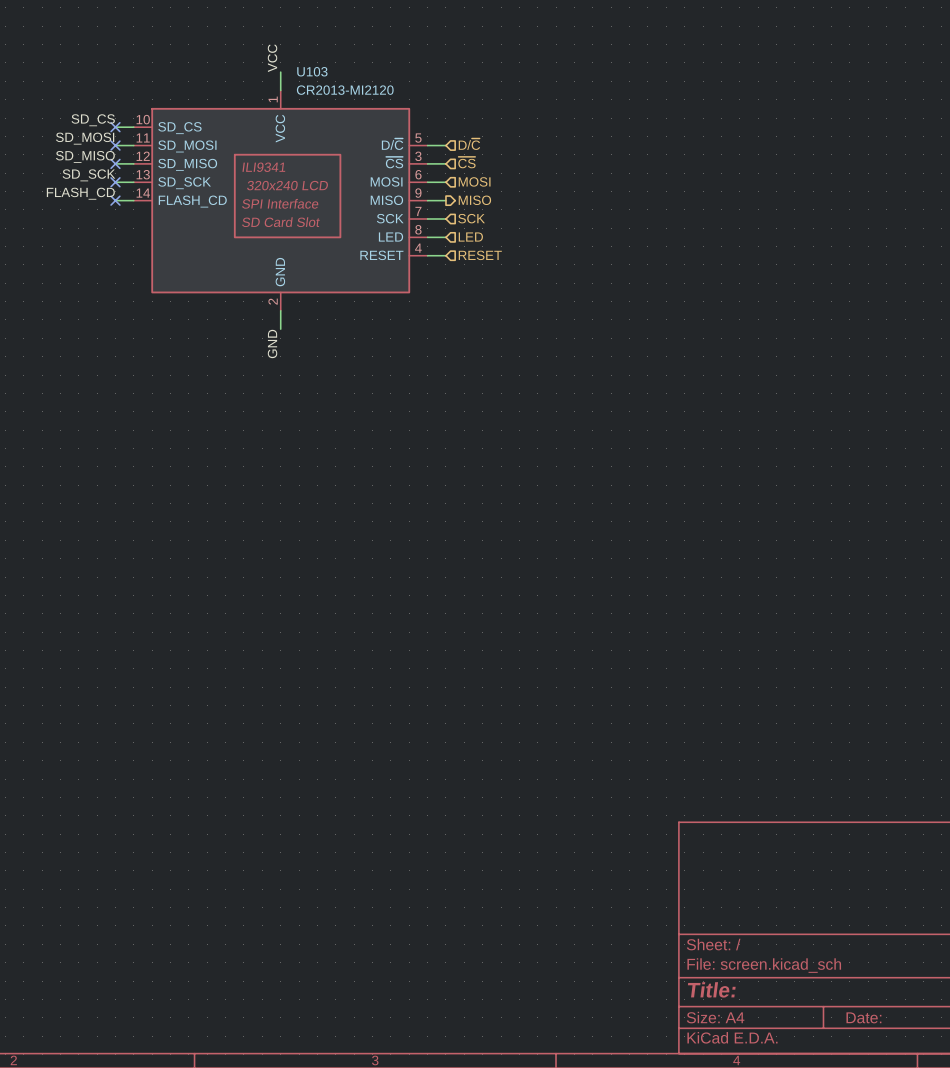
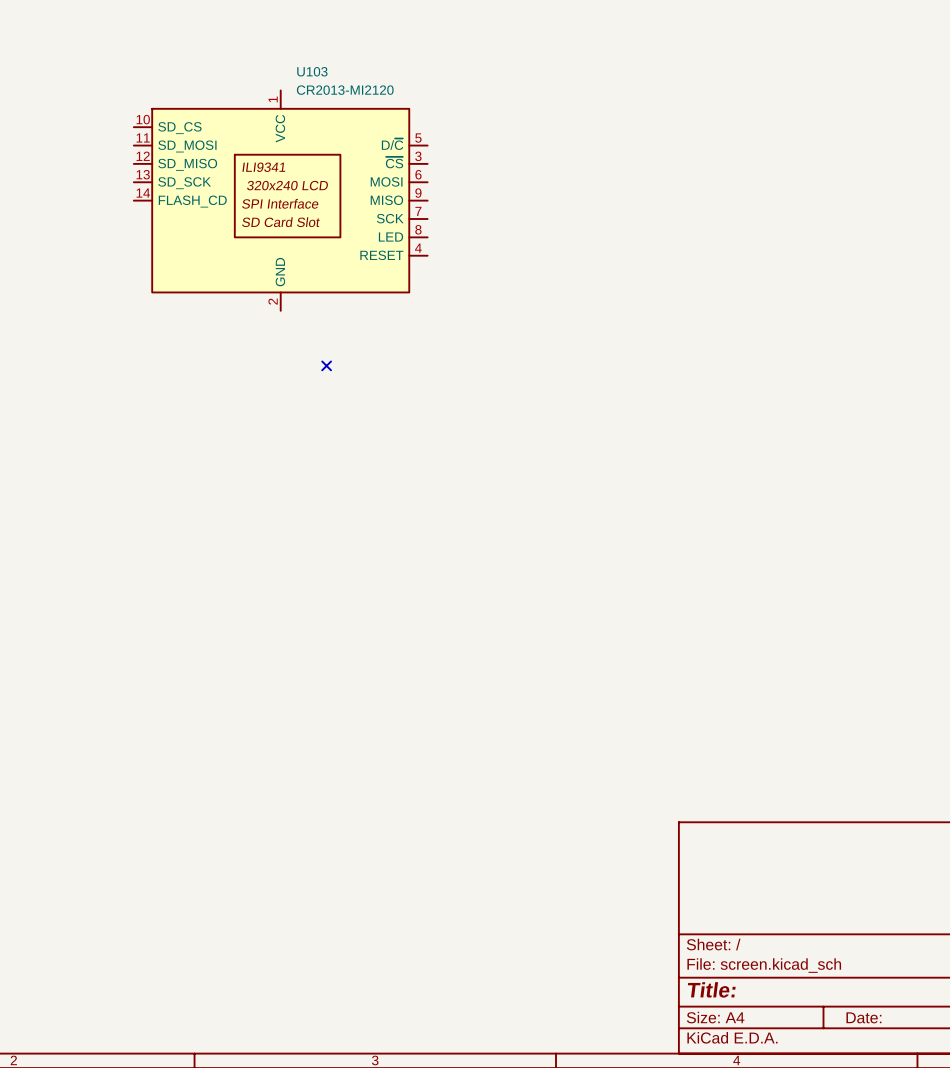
label: VCC (272, 58) -> none
wire: (280, 72) (280, 90) -> none
label: SD_CS (93, 120) -> none
wire: (115, 127) (133, 127) -> none
no-connect mark: (115, 127) -> none
label: SD_MOSI (85, 138) -> none
hierarchical label: D/~{C} (469, 144) -> none
wire: (115, 145) (133, 145) -> none
no-connect mark: (115, 145) -> none
wire: (427, 145) (445, 145) -> none
label: SD_MISO (85, 156) -> none
hierarchical label: ~{CS} (466, 162) -> none
wire: (115, 163) (133, 163) -> none
no-connect mark: (115, 163) -> none
wire: (427, 163) (445, 163) -> none
label: SD_SCK (88, 175) -> none
hierarchical label: MOSI (474, 181) -> none
wire: (115, 182) (133, 182) -> none
no-connect mark: (115, 182) -> none
wire: (427, 182) (445, 182) -> none
label: FLASH_CD (80, 193) -> none
wire: (115, 200) (133, 200) -> none
no-connect mark: (115, 200) -> none
wire: (427, 200) (445, 200) -> none
hierarchical label: MISO (474, 200) -> none
hierarchical label: SCK (471, 218) -> none
wire: (427, 219) (445, 219) -> none
wire: (427, 237) (445, 237) -> none
hierarchical label: LED (470, 237) -> none
wire: (427, 255) (445, 255) -> none
hierarchical label: RESET (480, 255) -> none
wire: (280, 310) (280, 329) -> none
label: GND (272, 343) -> none
no-connect mark: none -> (326, 365)

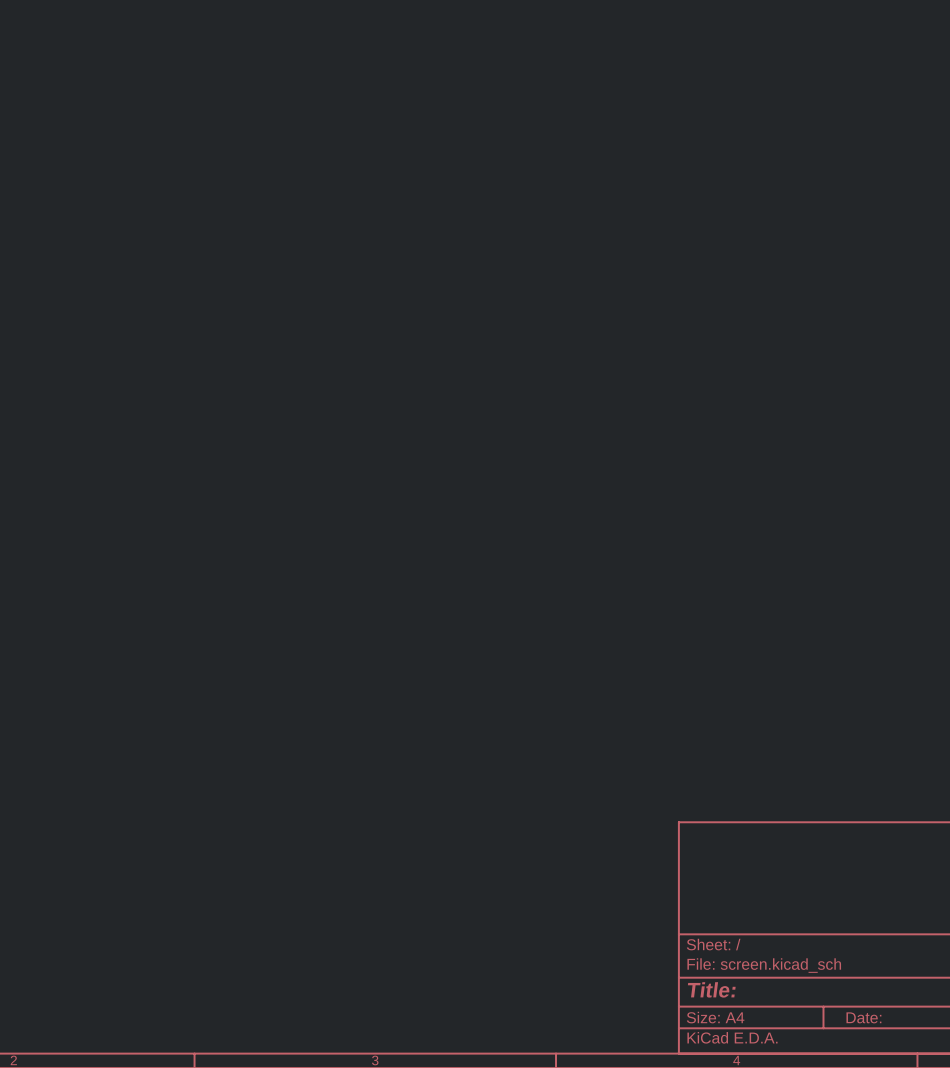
U103: CR2013-MI2120 (280, 200) -> none
no-connect mark: (326, 365) -> none

